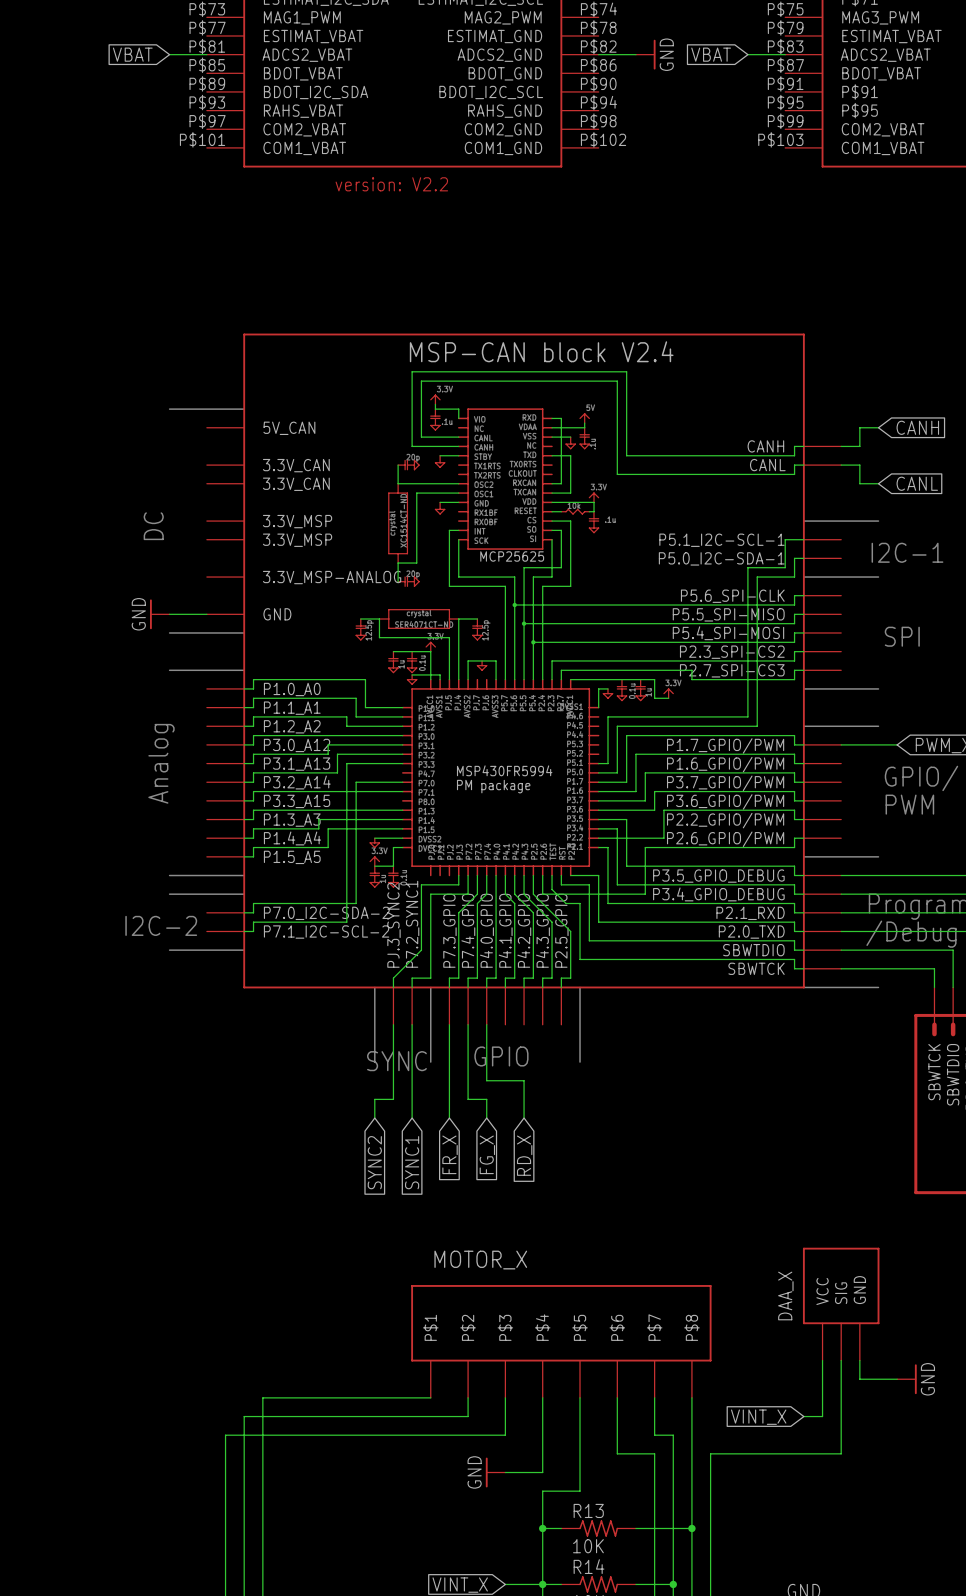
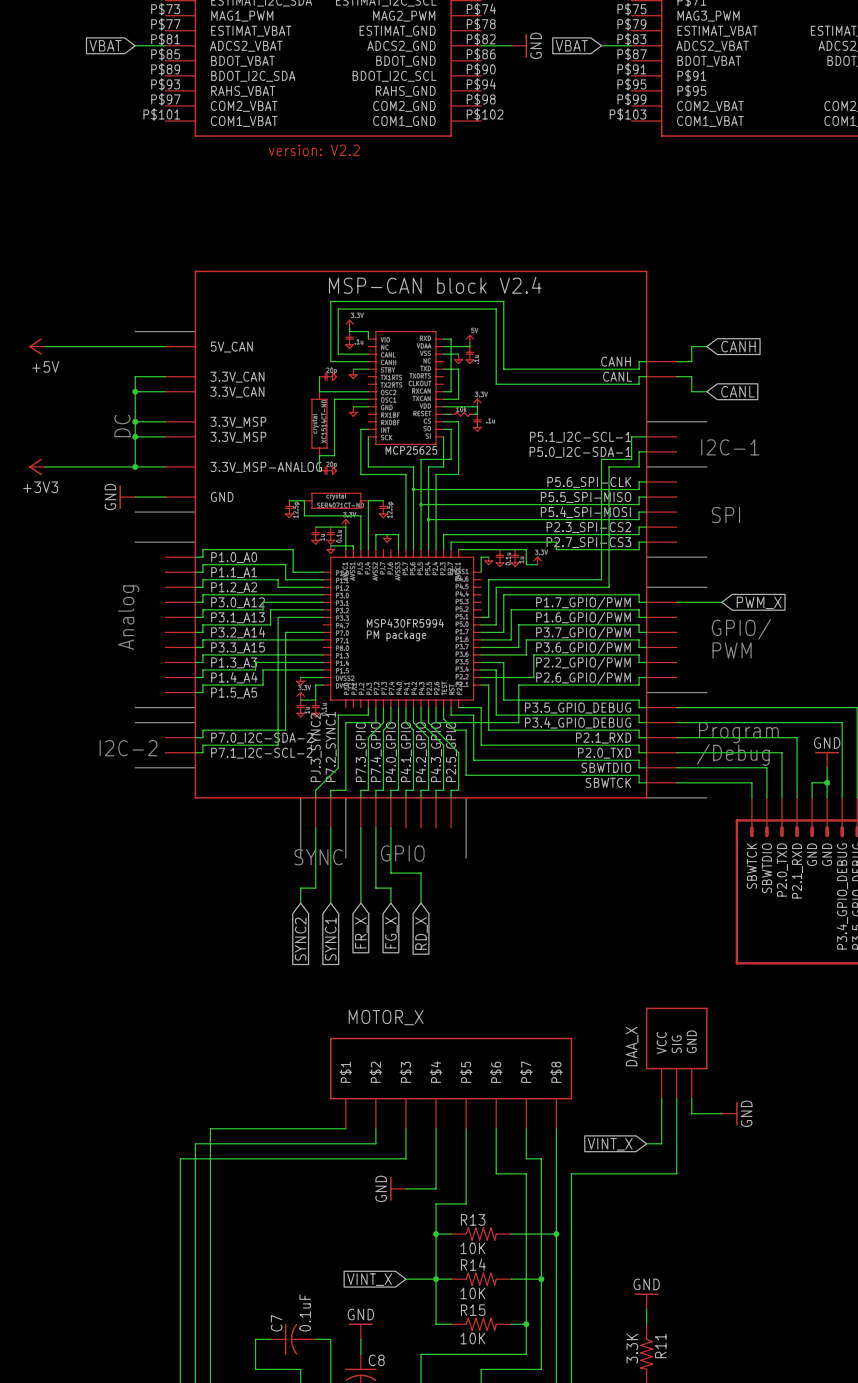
power symbol: none -> +5V (37, 346)
wire: none -> (44, 346) (165, 346)
wire: none -> (165, 376) (135, 376) (135, 466)
wire: none -> (135, 391) (165, 391)
junction: none -> (135, 391)
wire: none -> (135, 421) (165, 421)
junction: none -> (135, 421)
wire: none -> (135, 436) (165, 436)
junction: none -> (135, 436)
power symbol: none -> +3V3 (37, 466)
wire: none -> (44, 466) (165, 466)
junction: none -> (135, 466)

